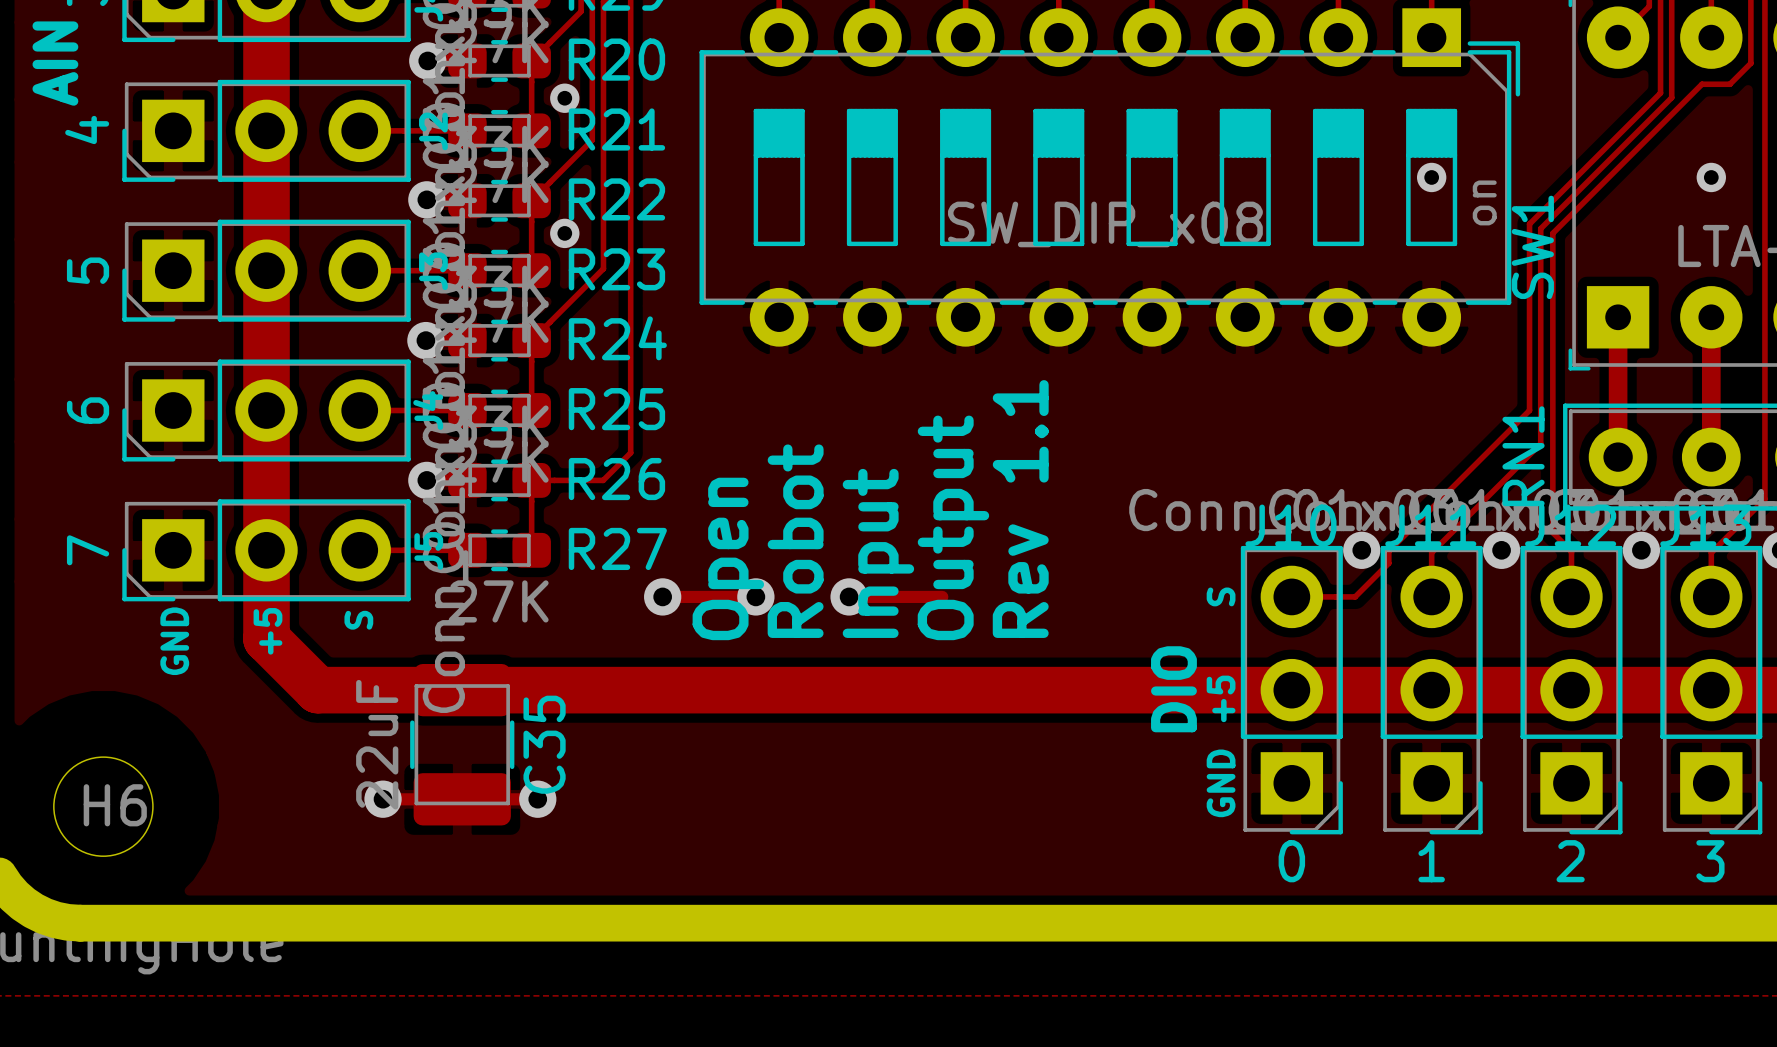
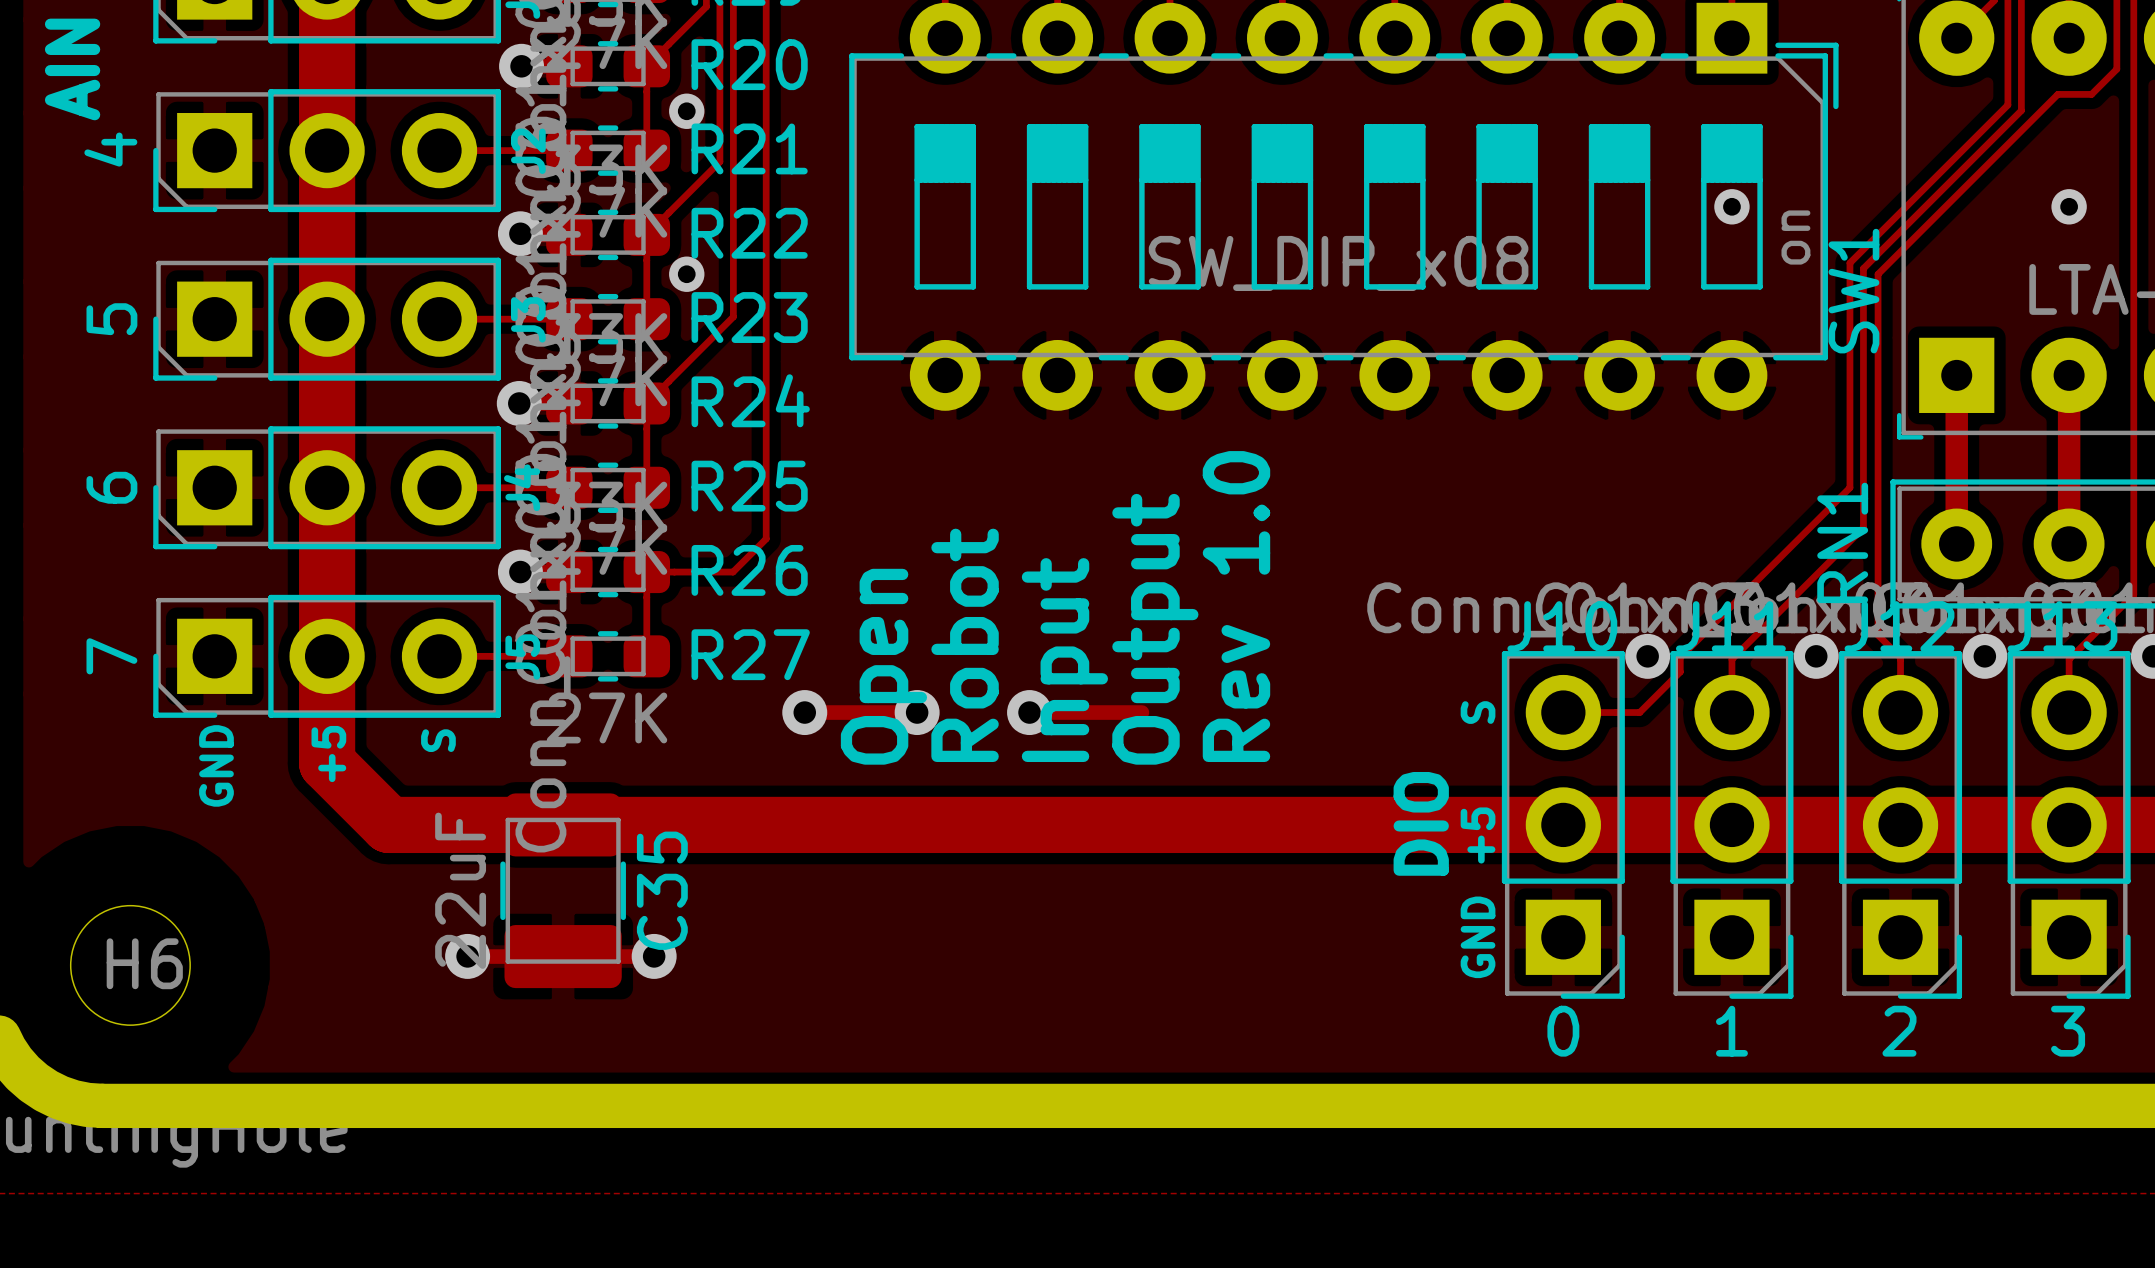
text: Rev 1.1 (1020, 509) -> Rev 1.0 (1236, 606)

